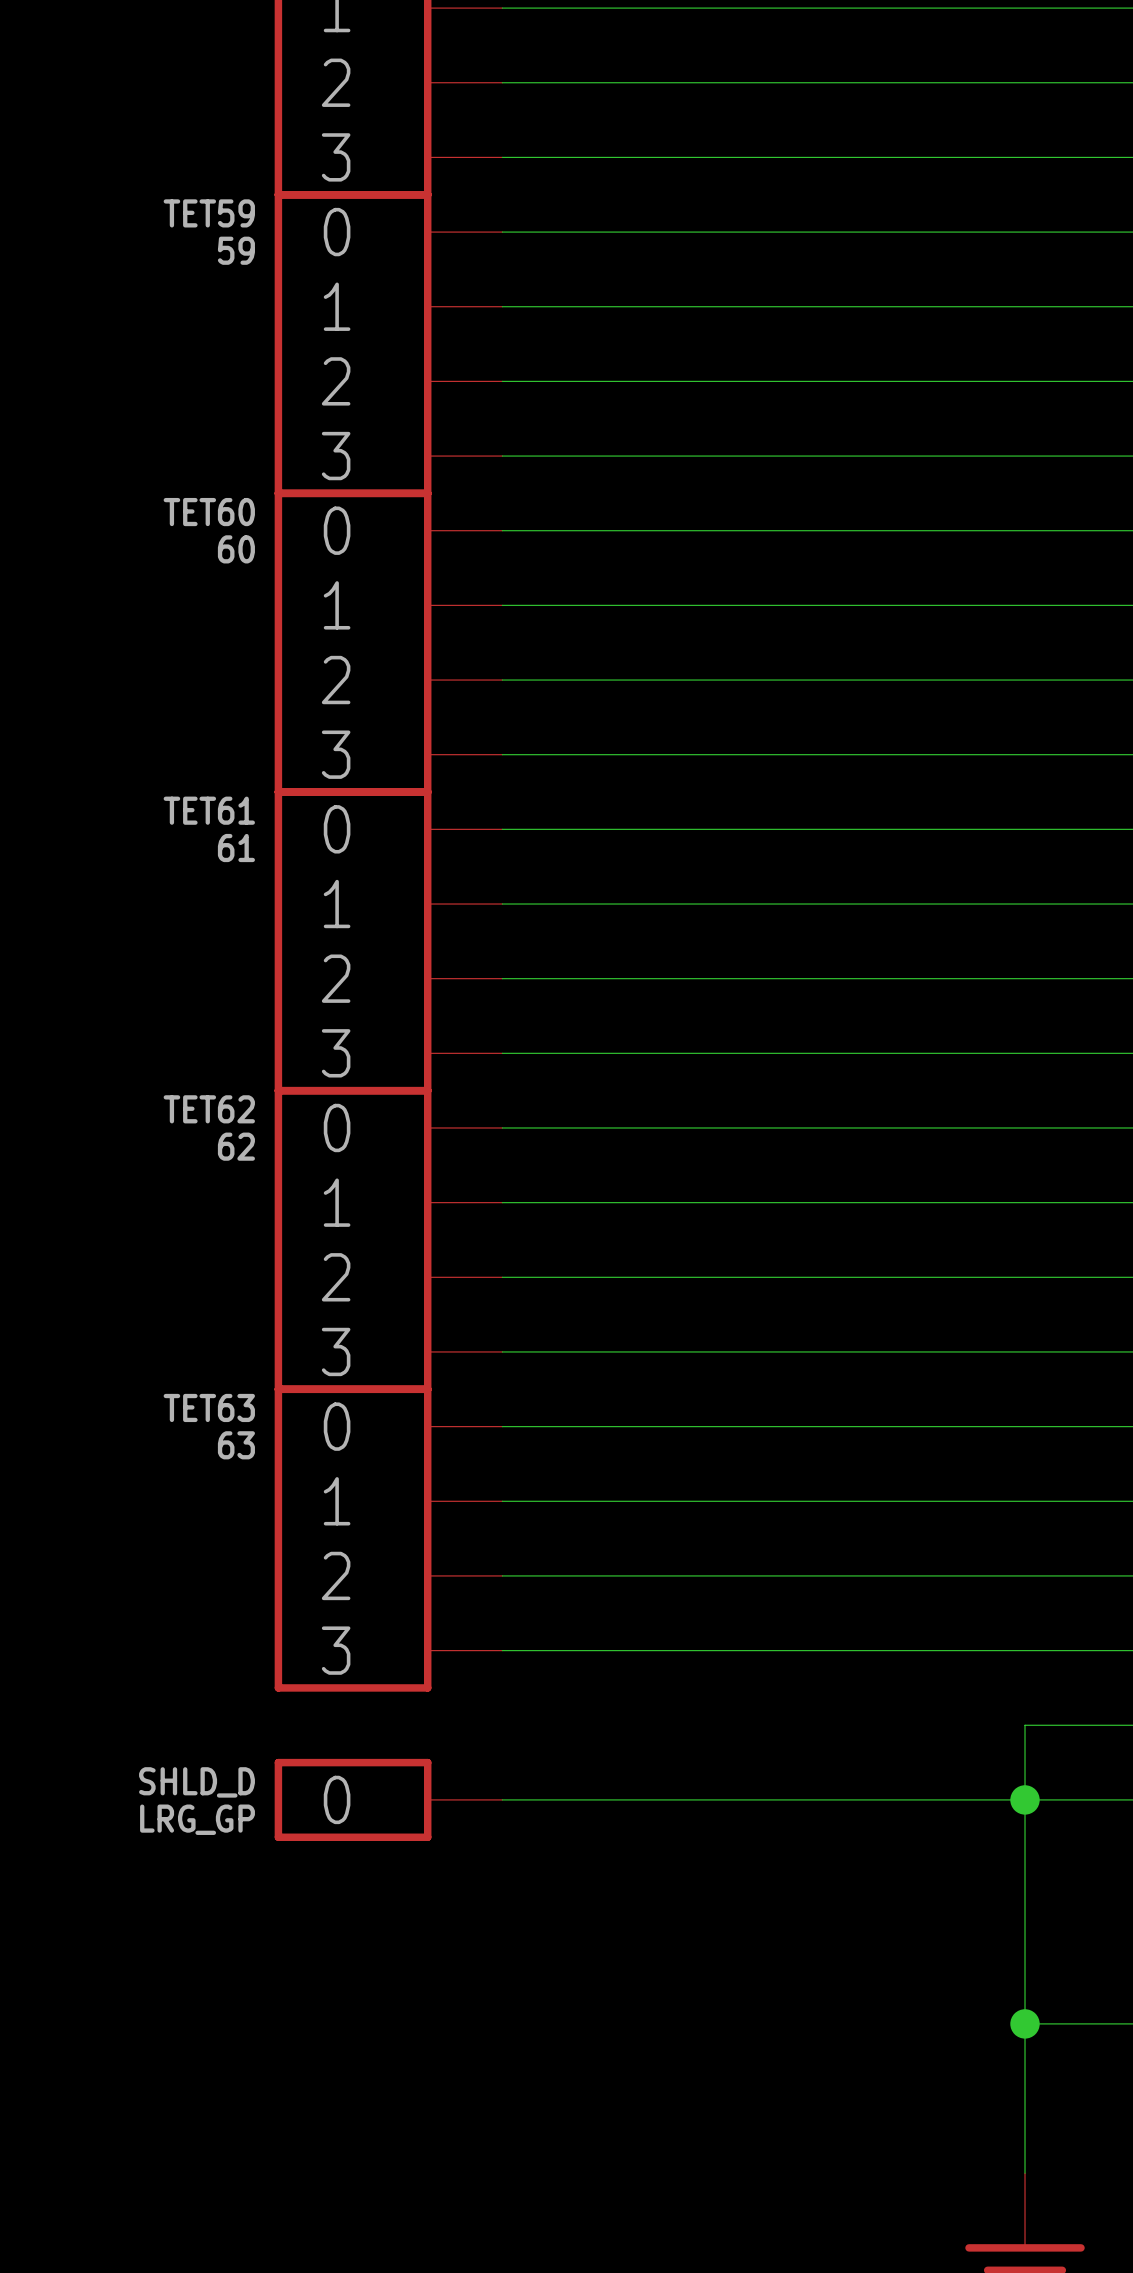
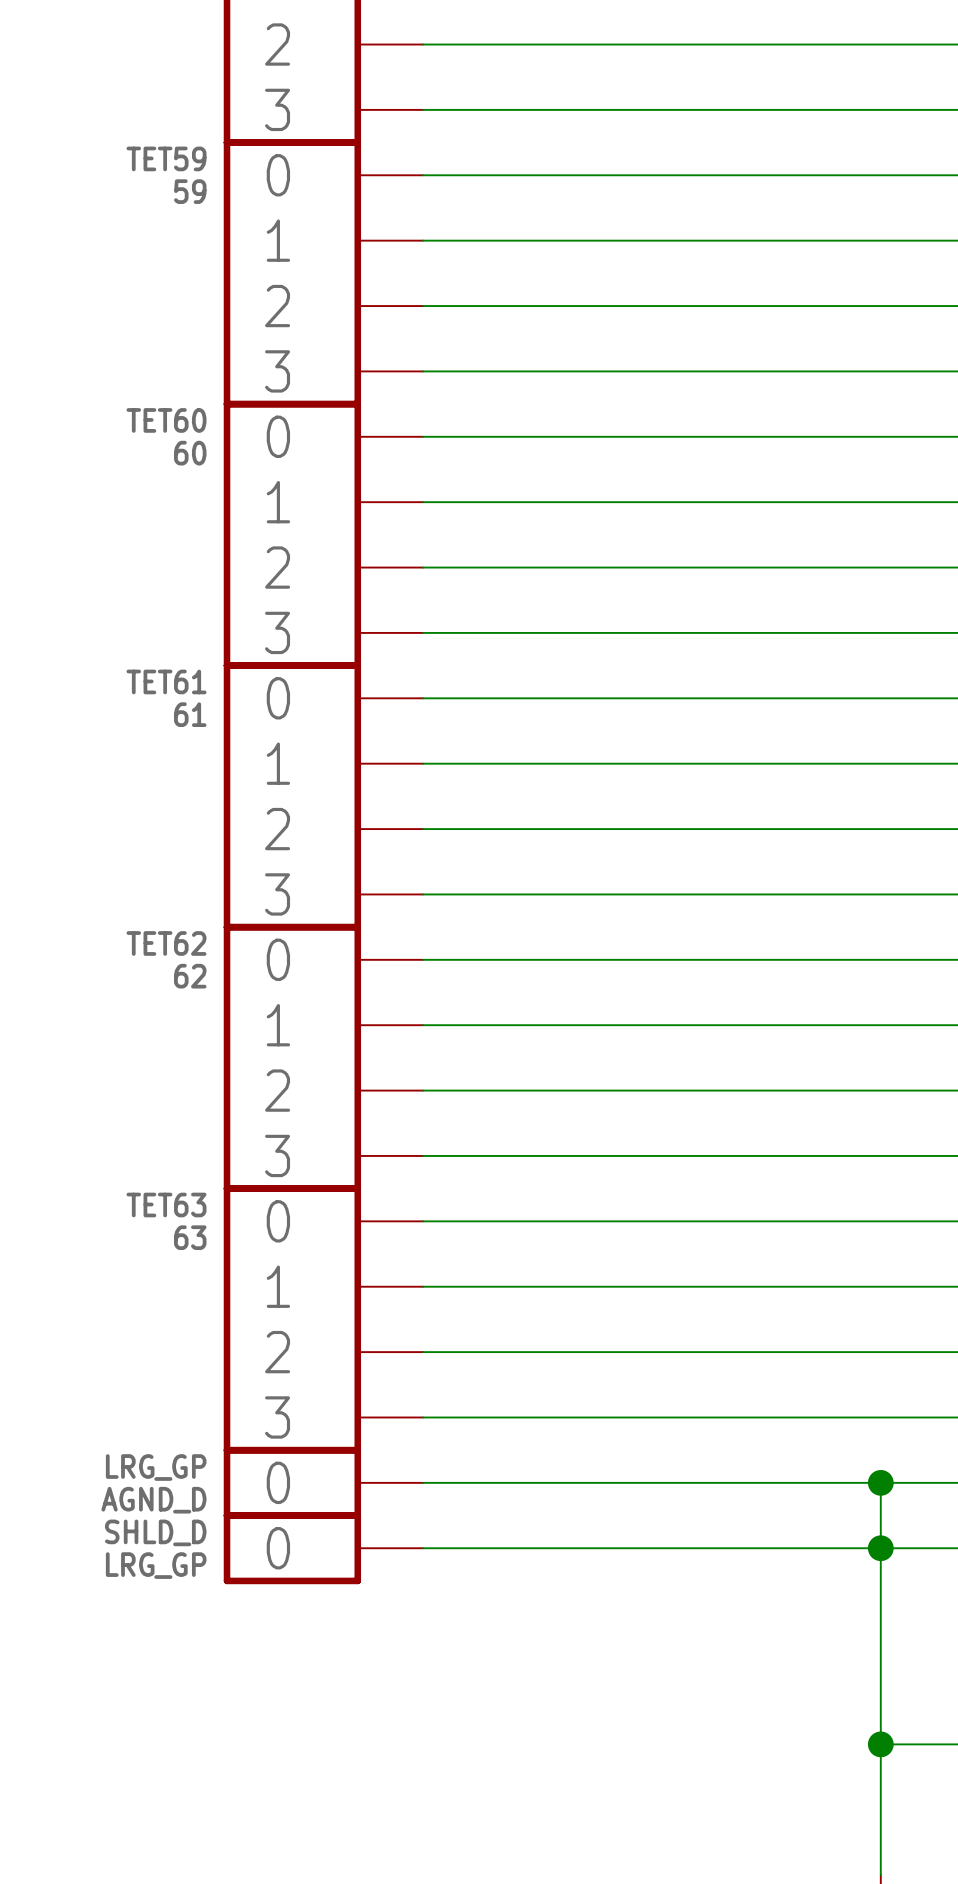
AGND_D: none -> LRG_GP (323, 1482)
wire: none -> (423, 1482) (880, 1482)
junction: none -> (880, 1482)

